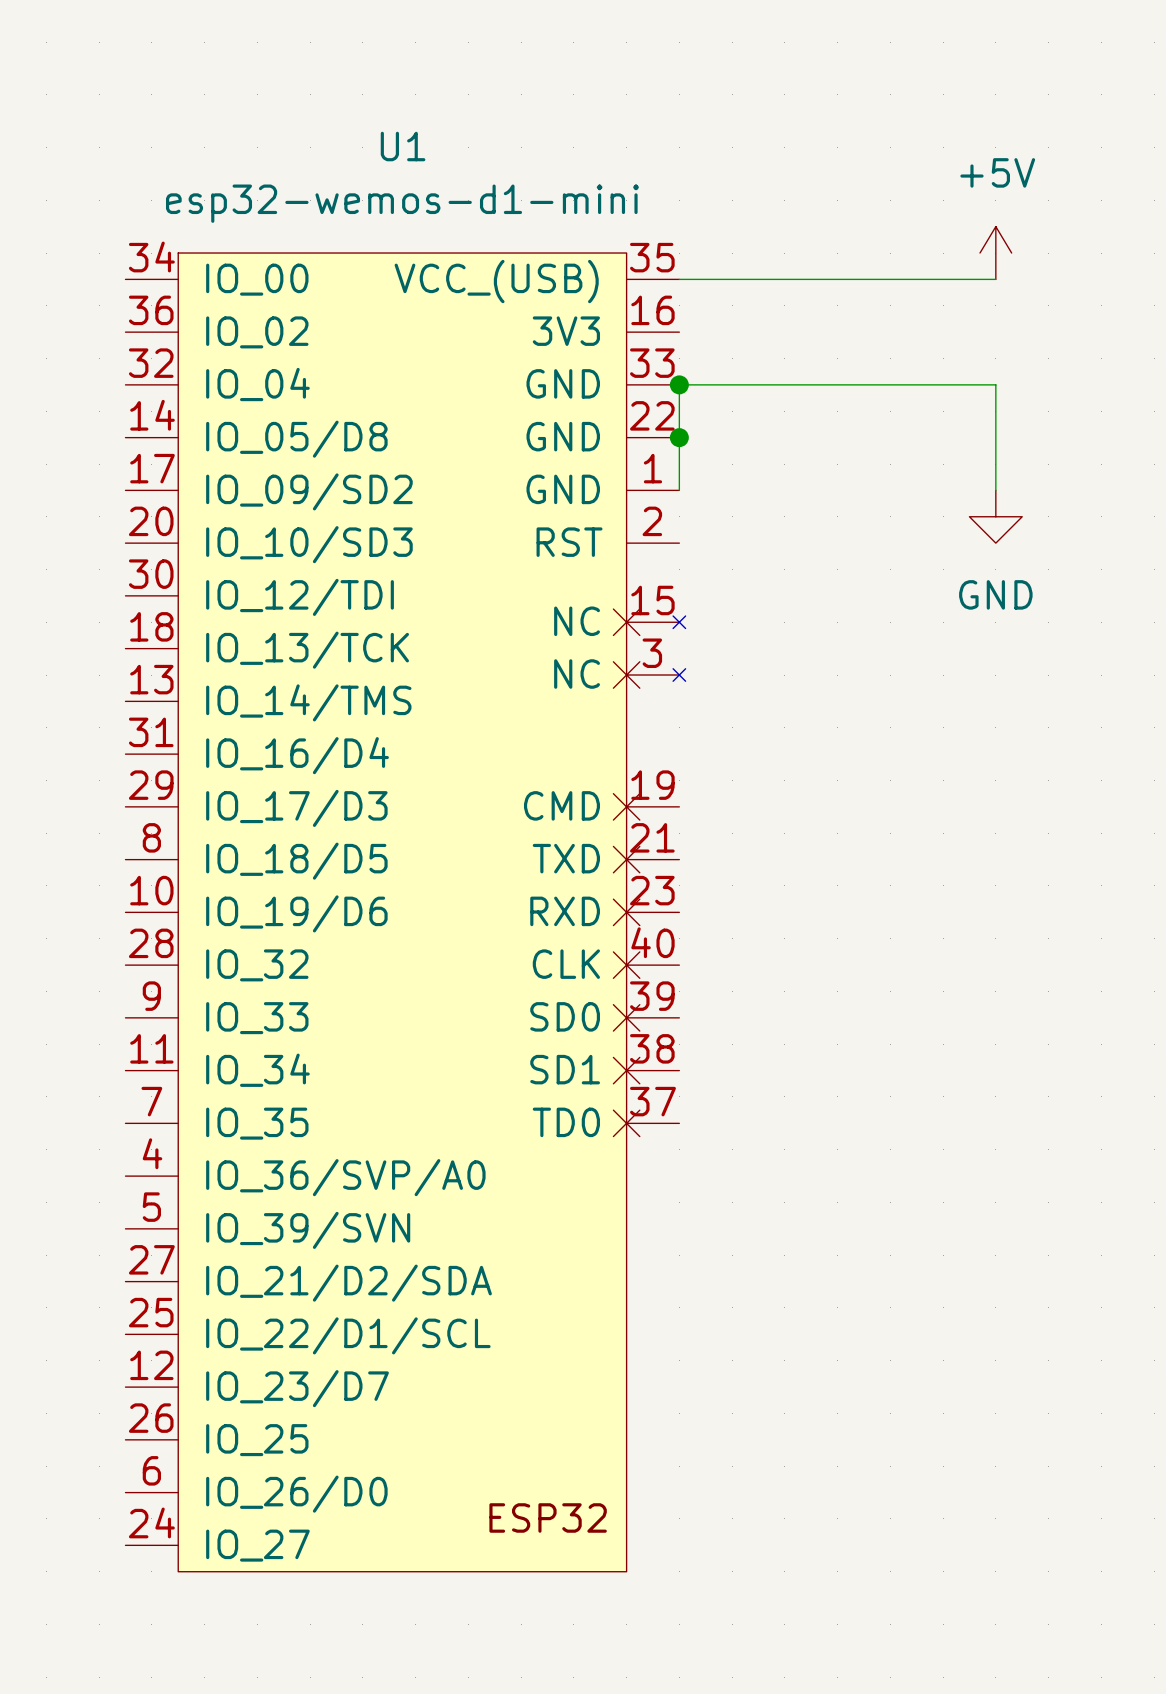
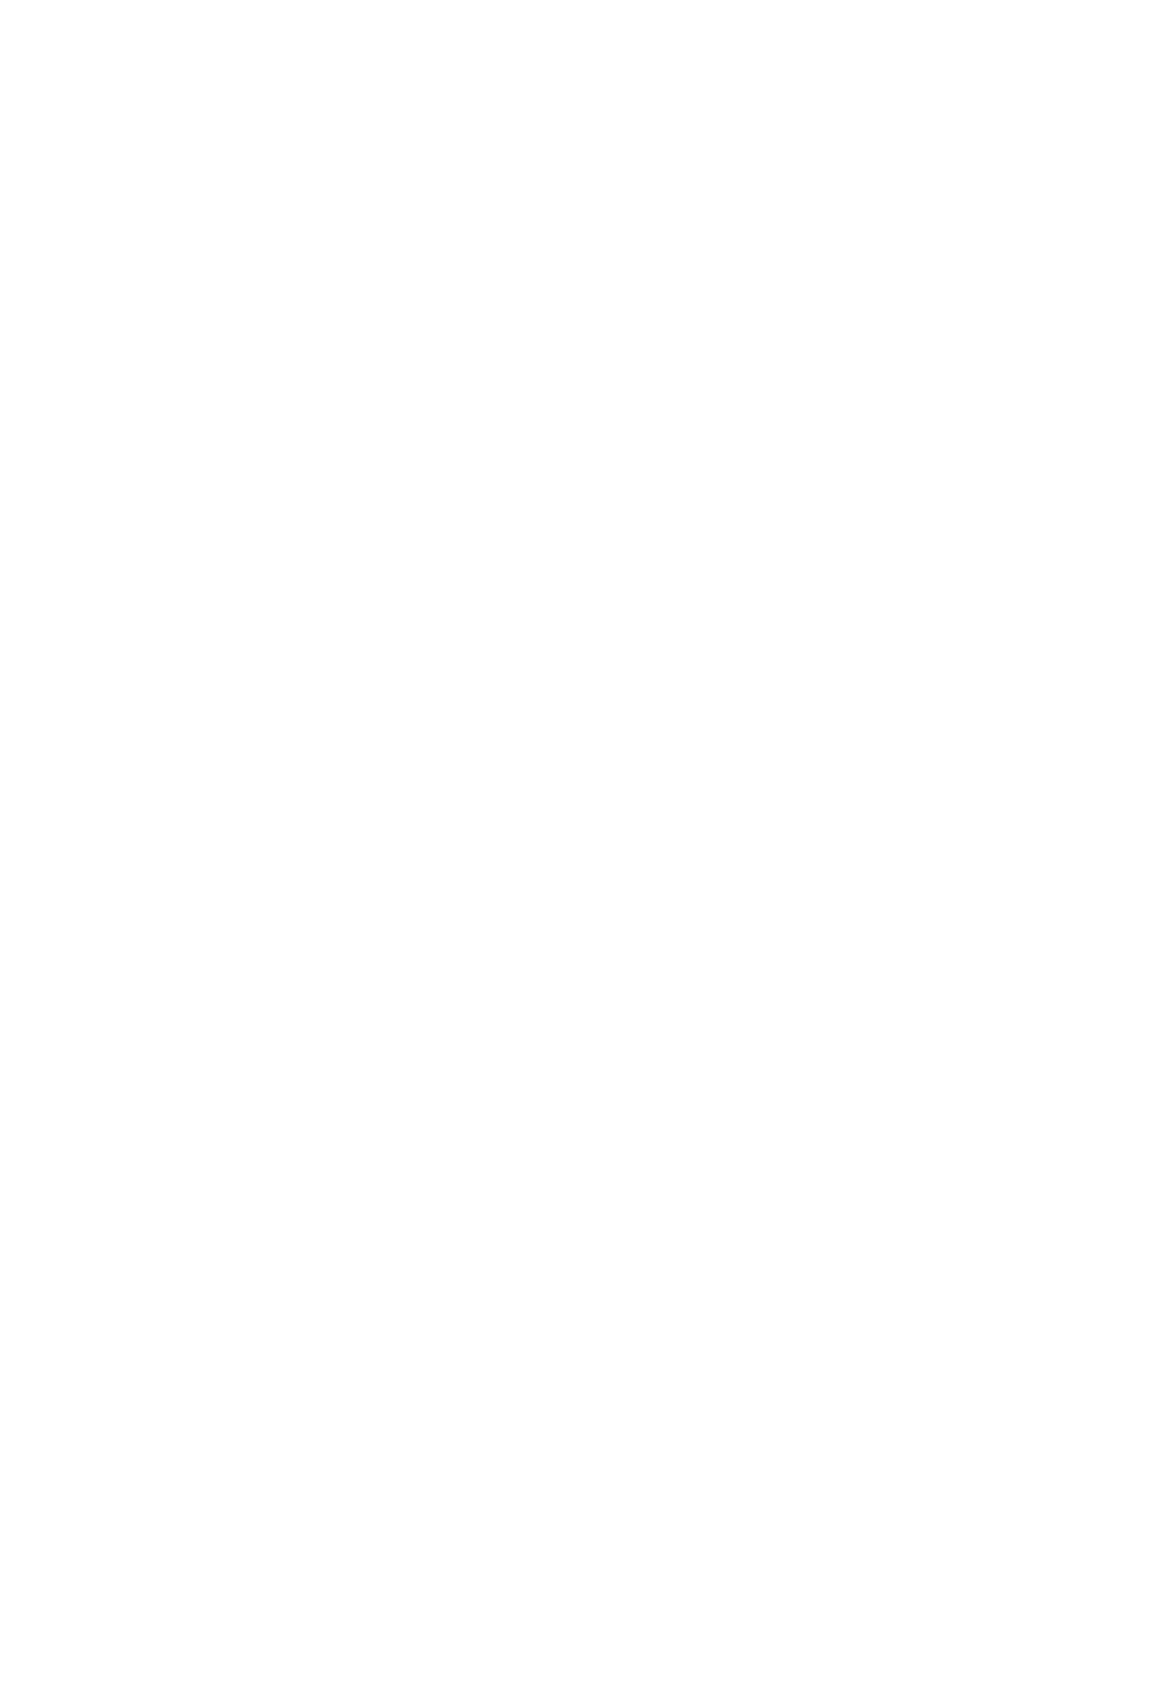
power symbol: +5V (995, 253) -> none
wire: (679, 279) (995, 279) -> none
junction: (679, 384) -> none
junction: (679, 437) -> none
wire: (679, 490) (679, 384) (995, 384) (995, 490) -> none
power symbol: GND (995, 516) -> none
U1: esp32-wemos-d1-mini (405, 912) -> none

